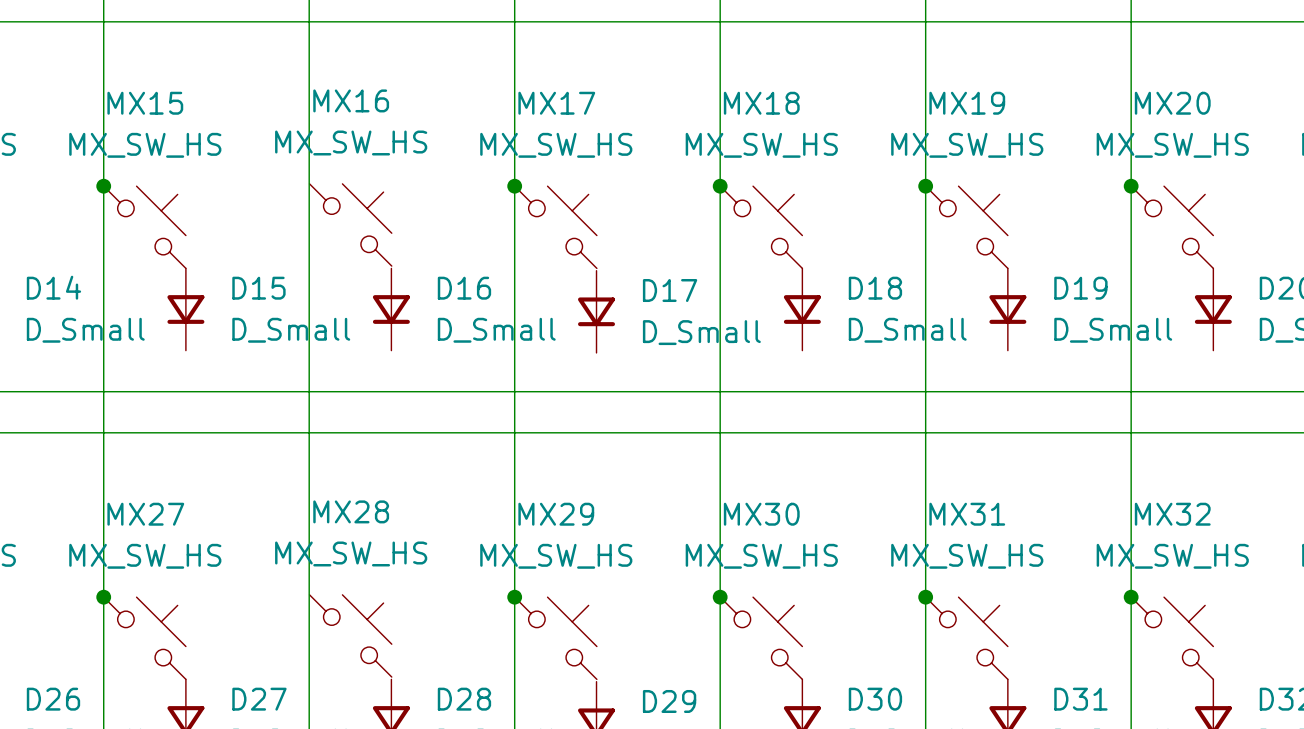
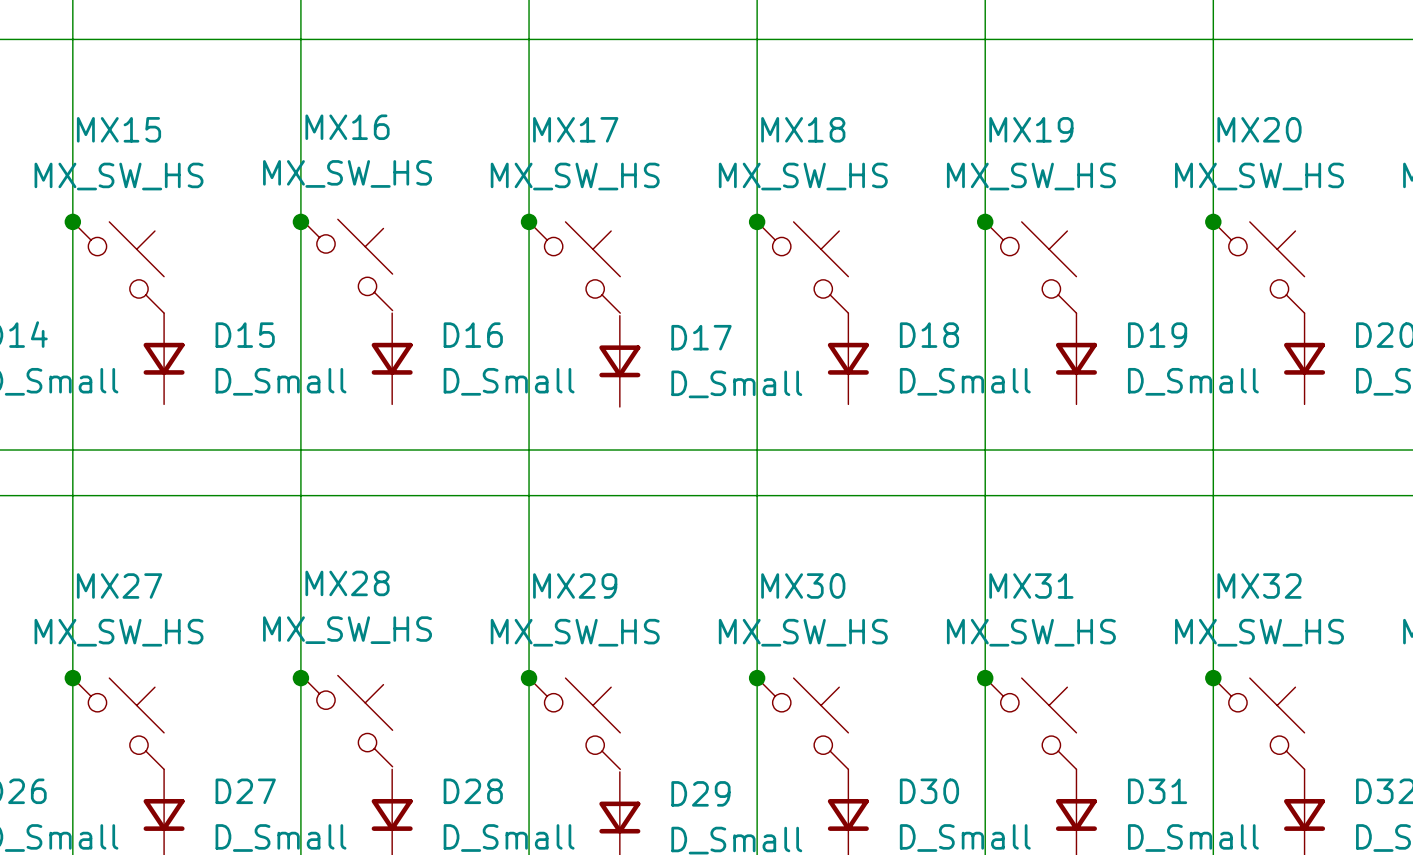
junction: none -> (300, 221)
junction: none -> (300, 678)

